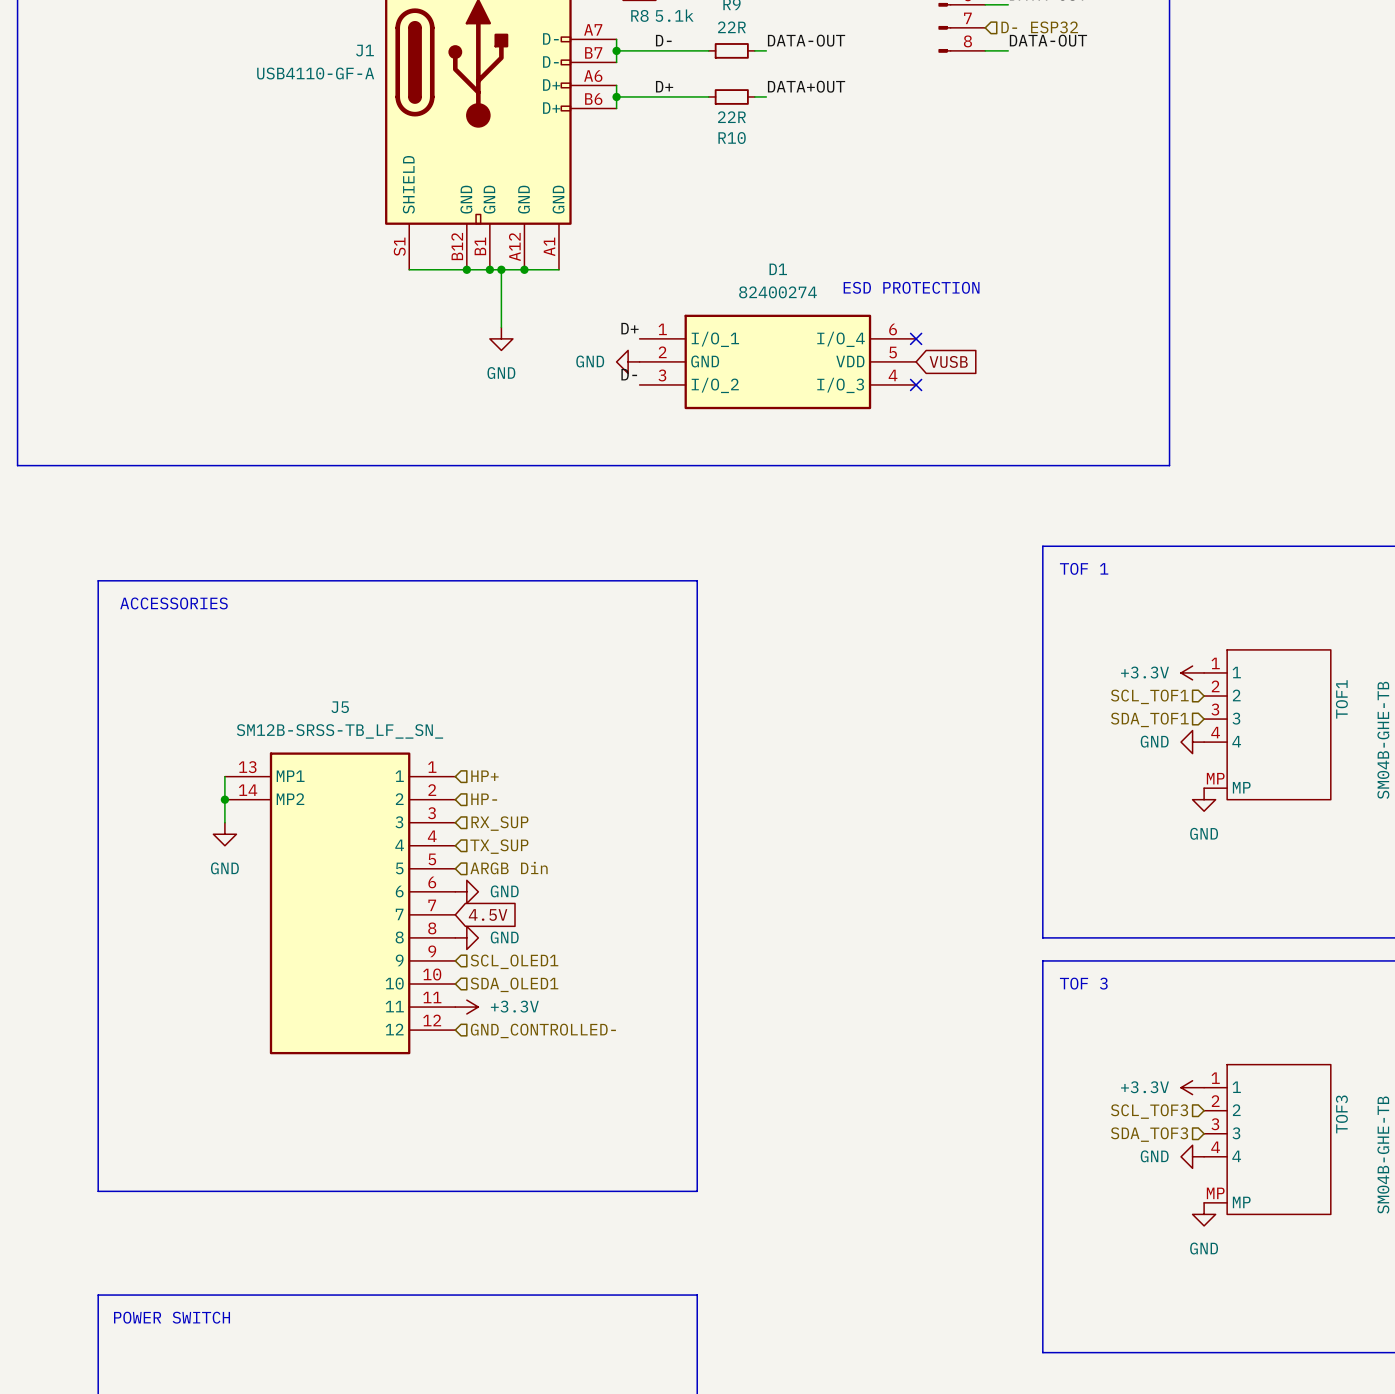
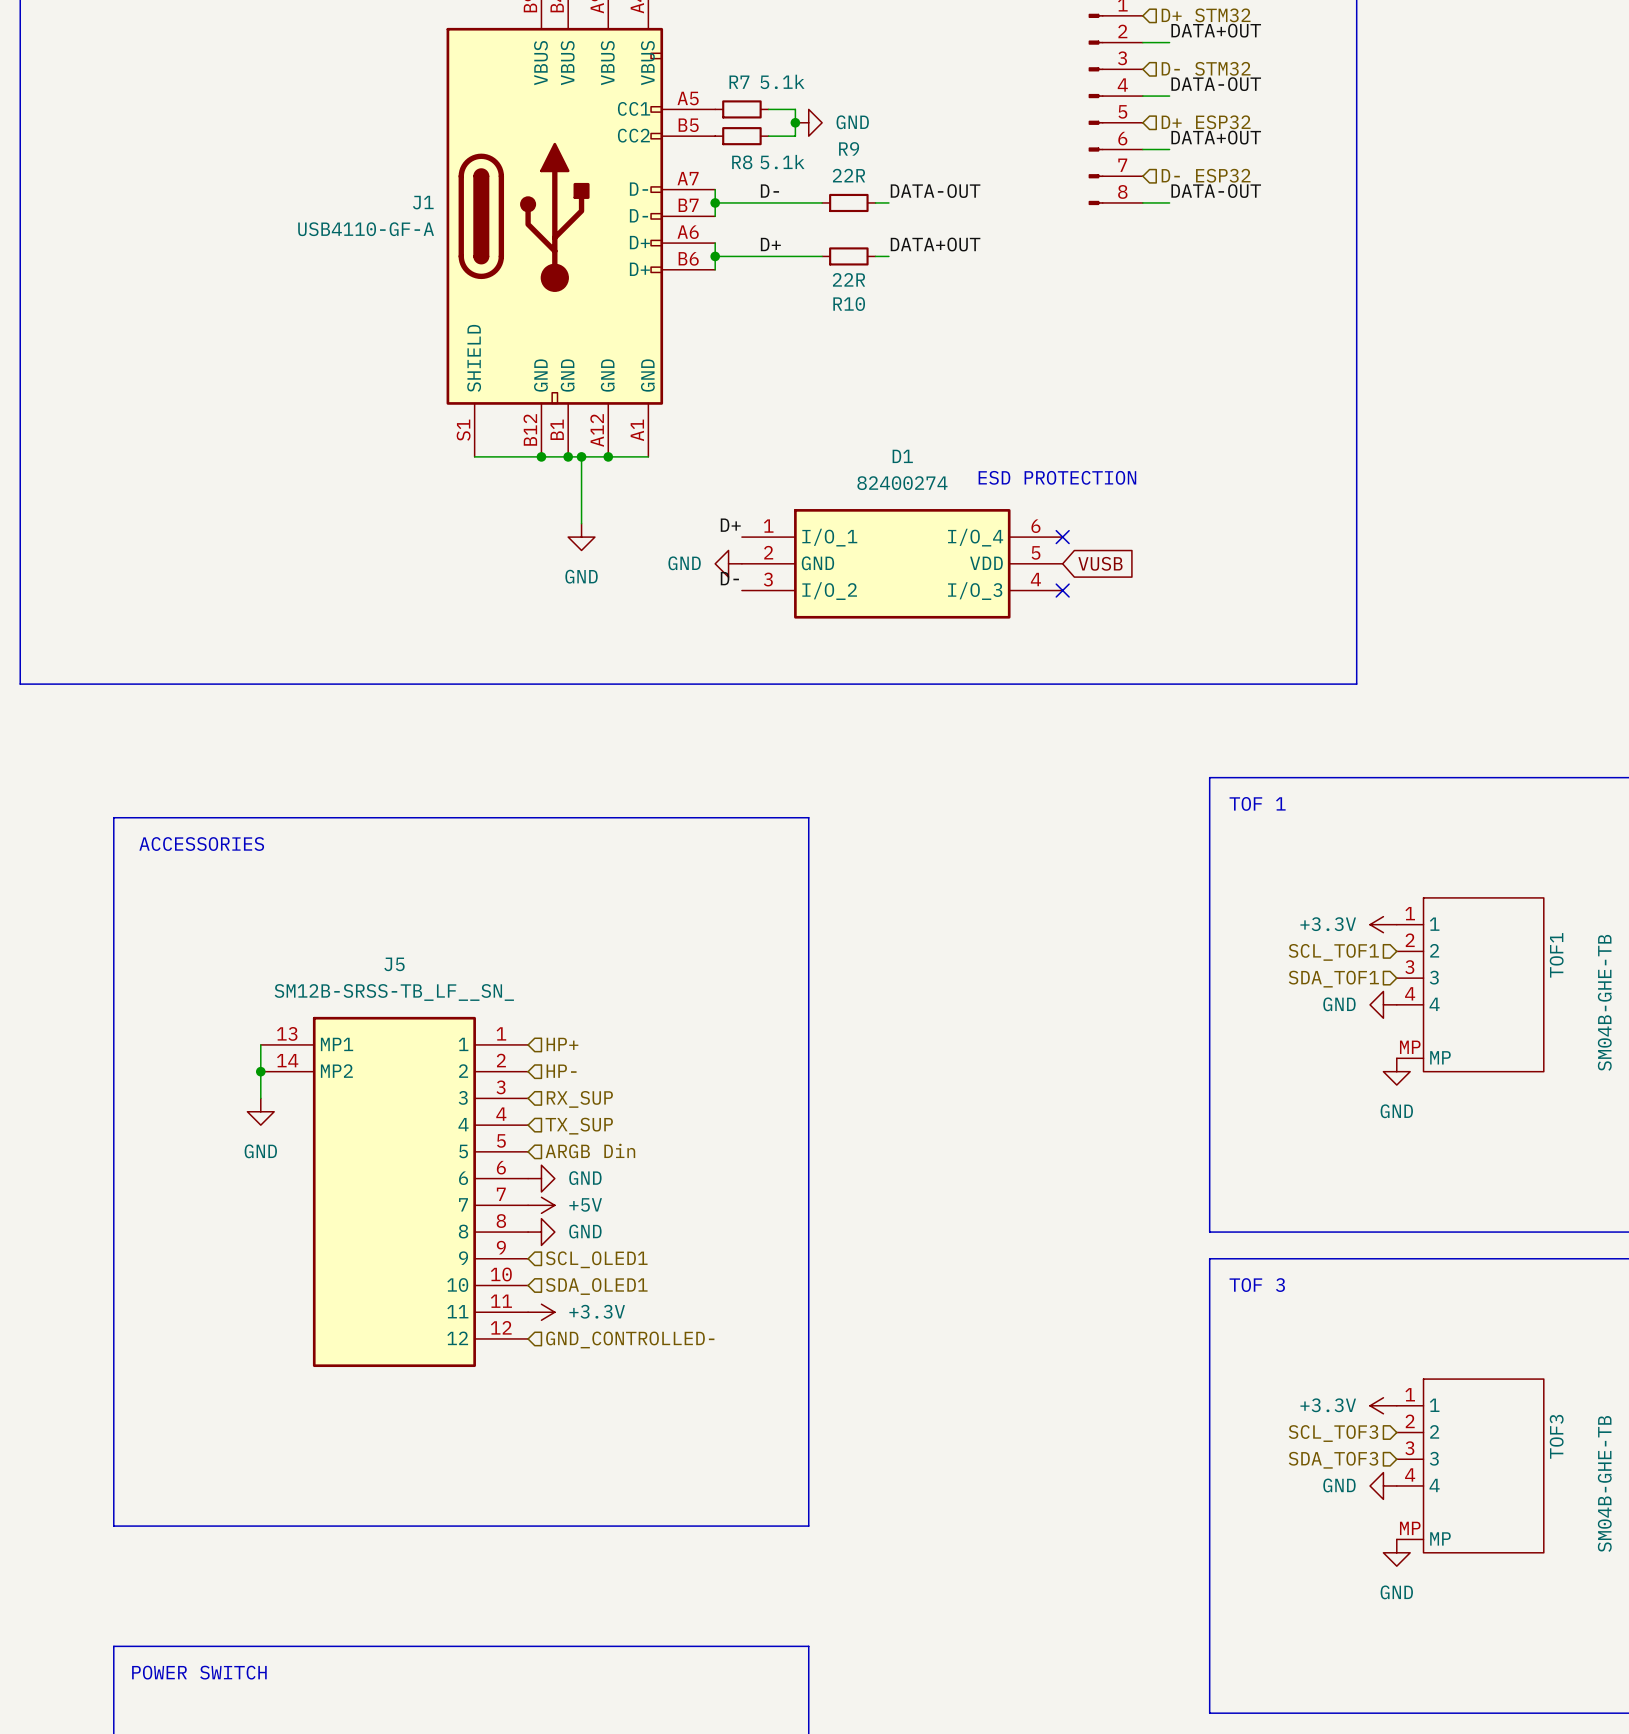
power symbol: none -> +5V (541, 1205)
global label: 4.5V (488, 914) -> none

